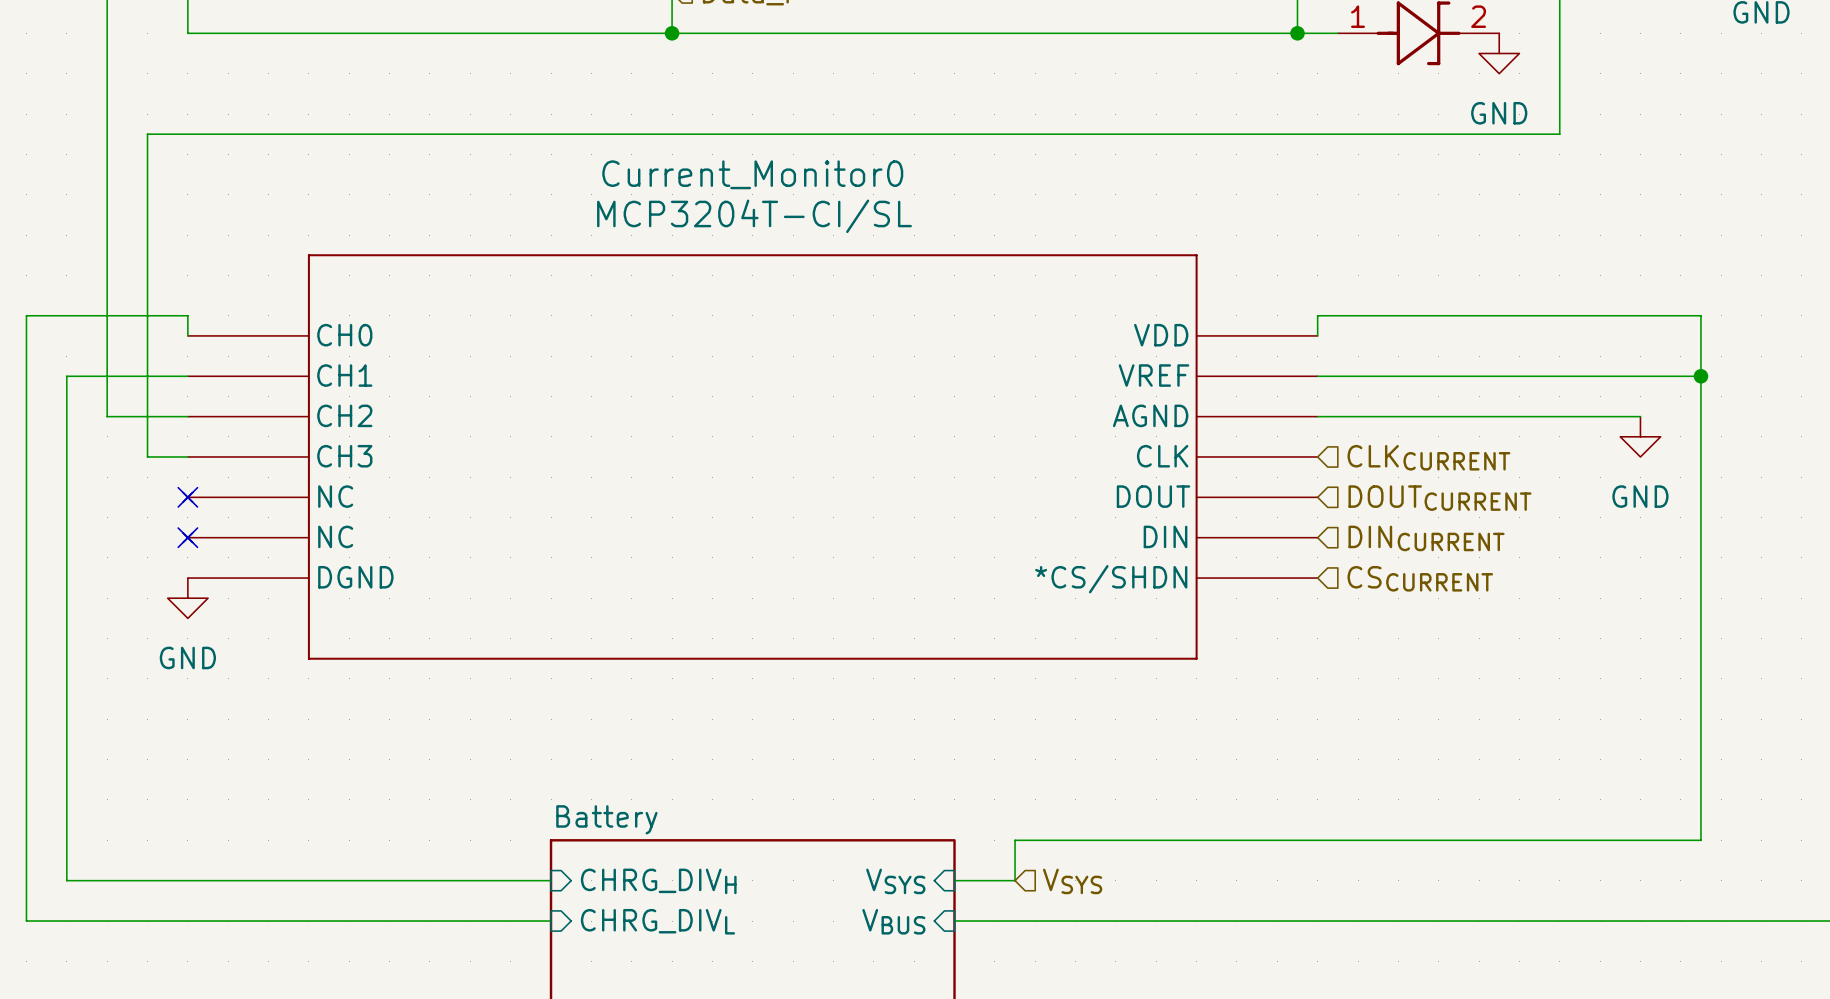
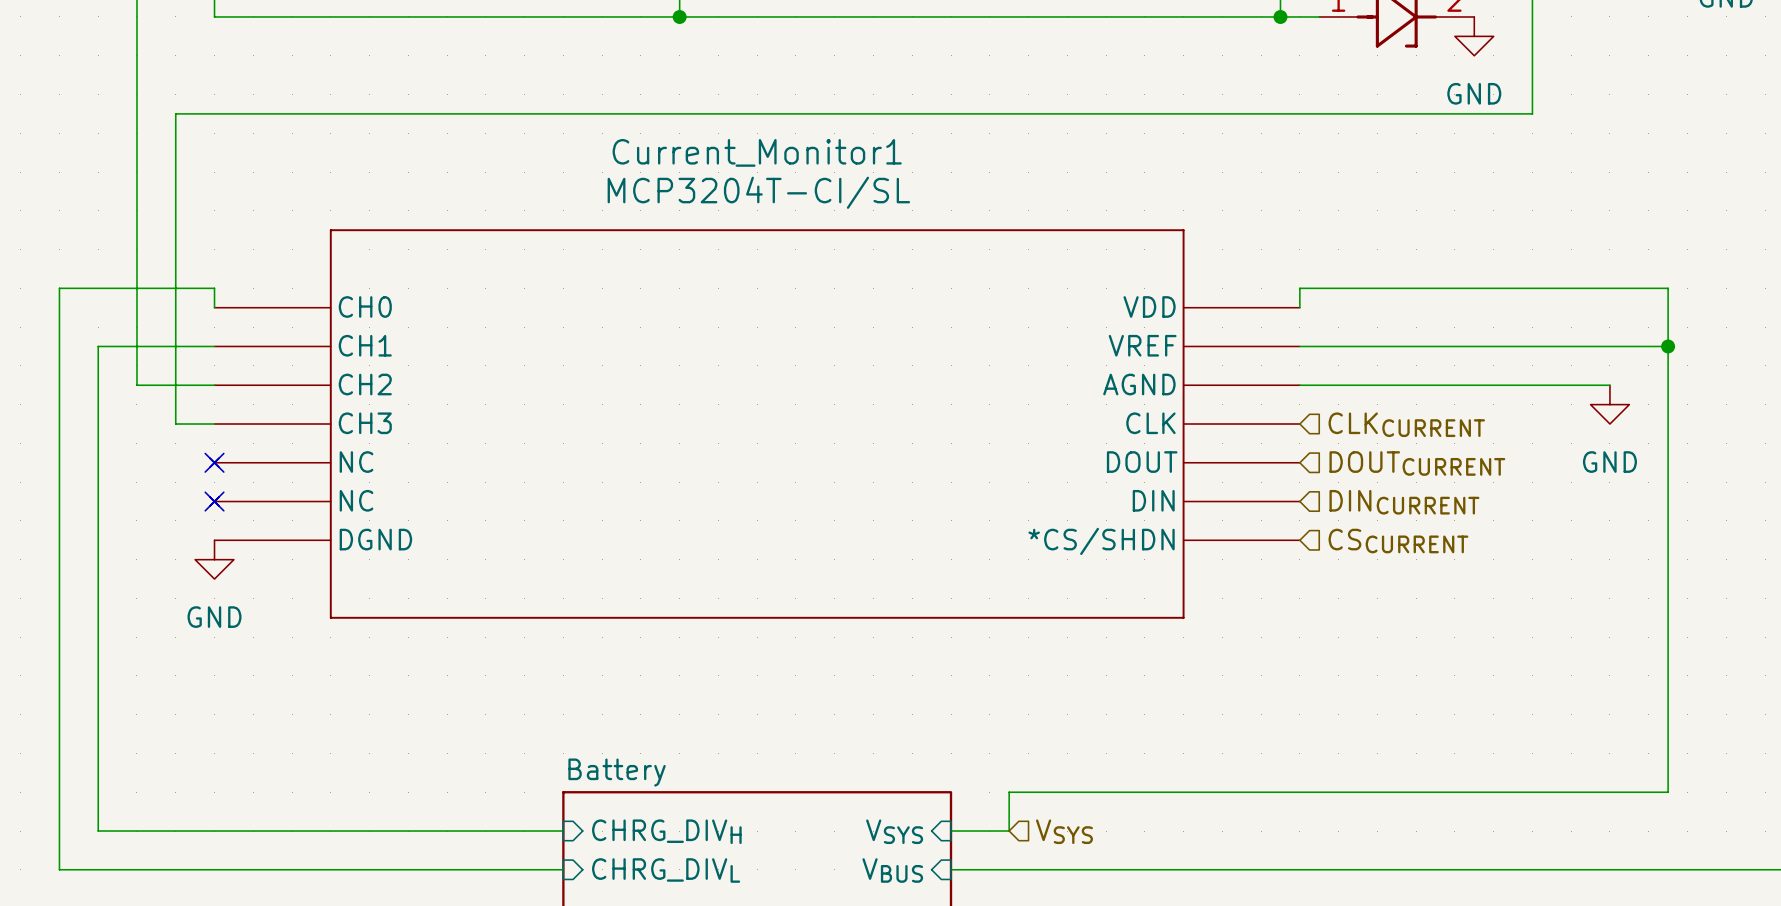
Current_Monitor0 name: Current_Monitor0 (752, 174) -> Current_Monitor1 (757, 152)

